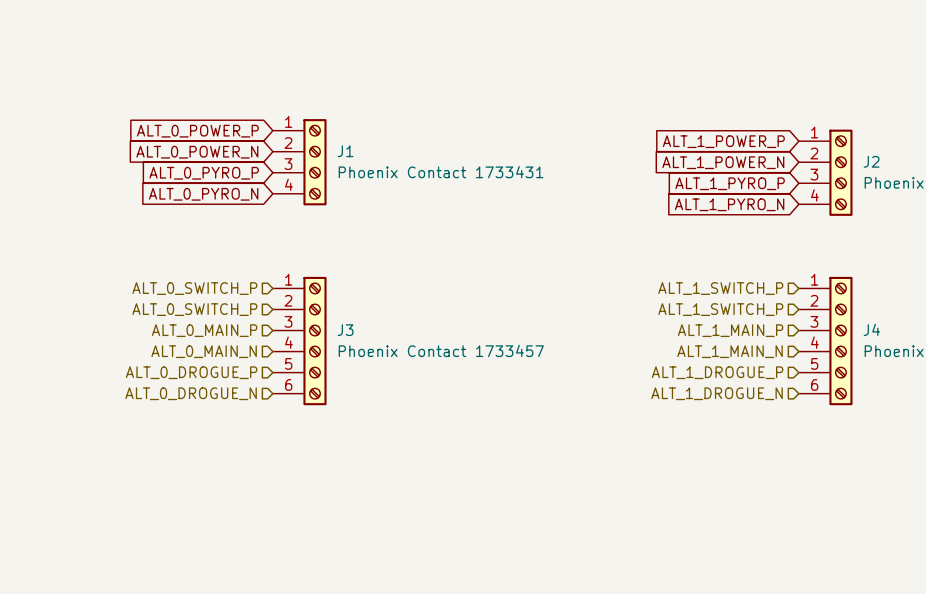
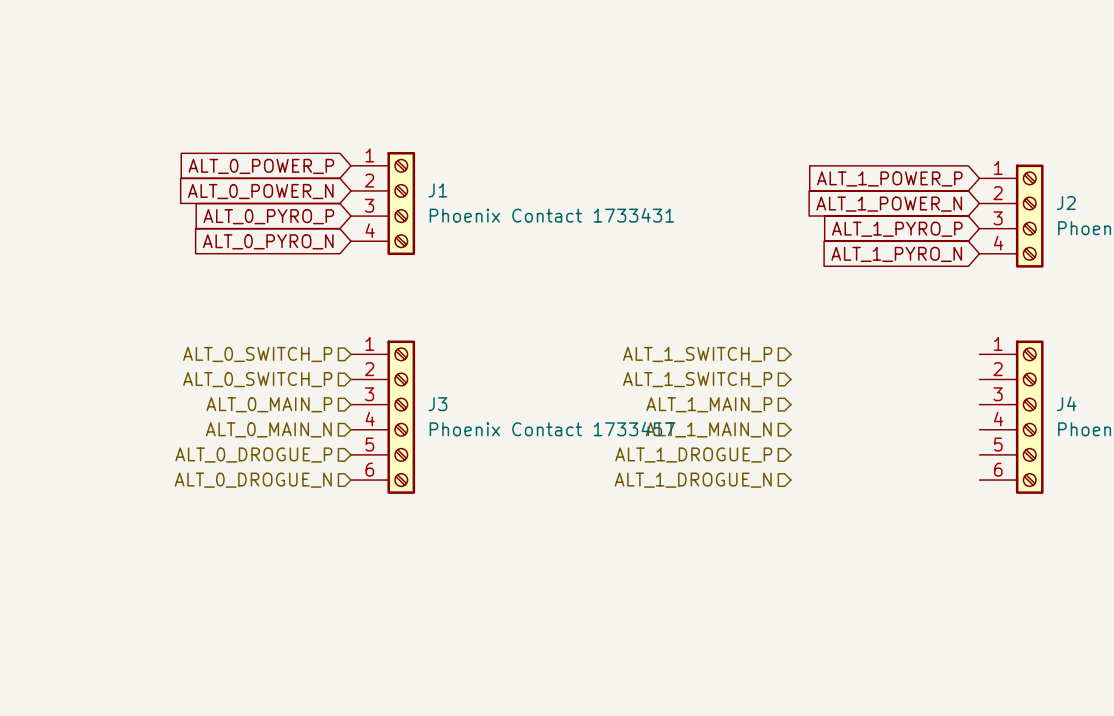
hierarchical label: none -> ALT_1_SWITCH_P (697, 354)
hierarchical label: ALT_1_SWITCH_P (720, 288) -> none
hierarchical label: none -> ALT_1_SWITCH_P (697, 379)
hierarchical label: ALT_1_SWITCH_P (720, 309) -> none
hierarchical label position: ALT_1_MAIN_P (730, 330) -> ALT_1_MAIN_P (709, 404)
hierarchical label position: ALT_1_MAIN_N (730, 351) -> ALT_1_MAIN_N (708, 429)
hierarchical label position: ALT_1_DROGUE_P (717, 372) -> ALT_1_DROGUE_P (693, 455)
hierarchical label position: ALT_1_DROGUE_N (717, 393) -> ALT_1_DROGUE_N (693, 480)

